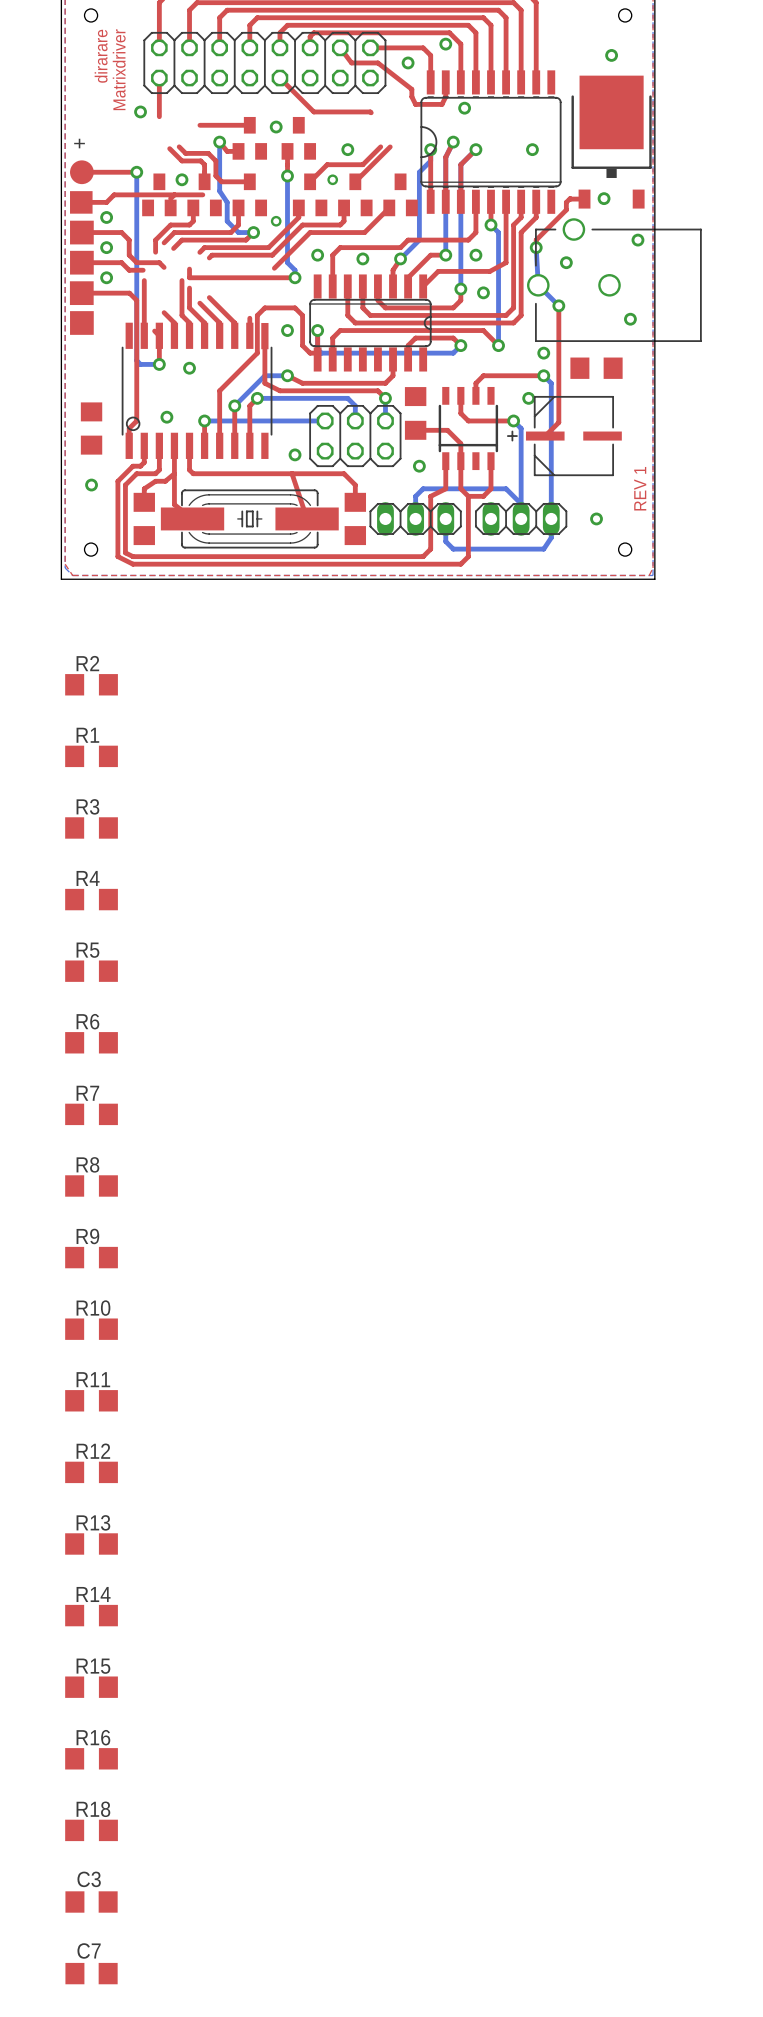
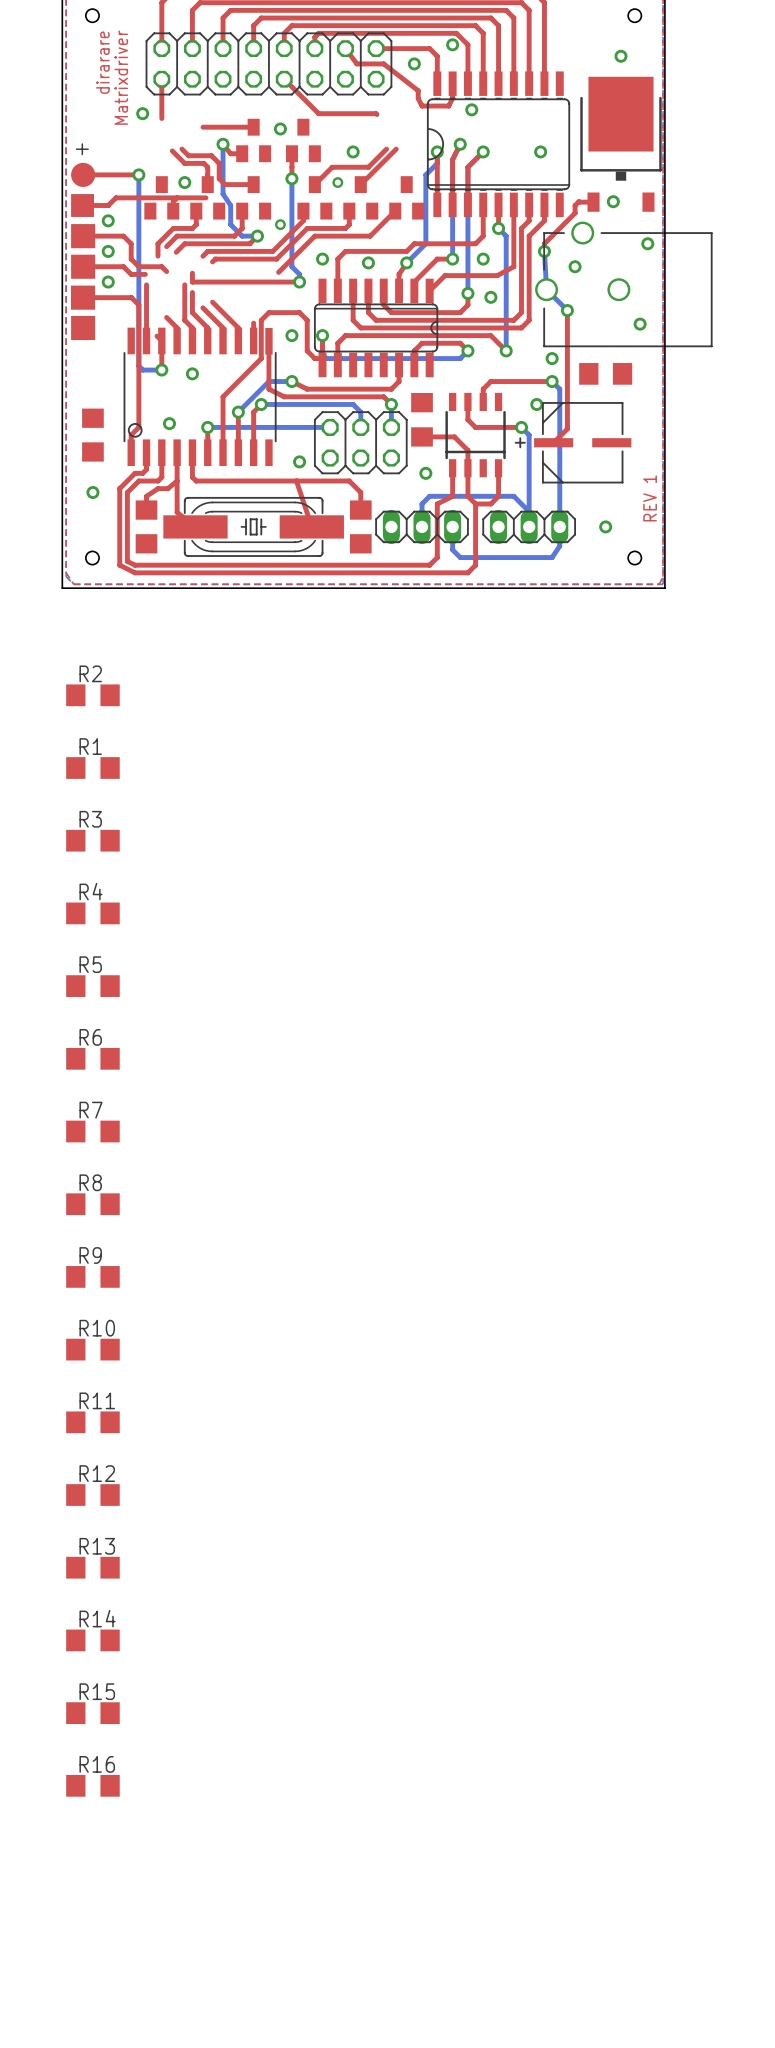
R18: (91, 1830) -> none
C3: (91, 1901) -> none
C7: (91, 1973) -> none

